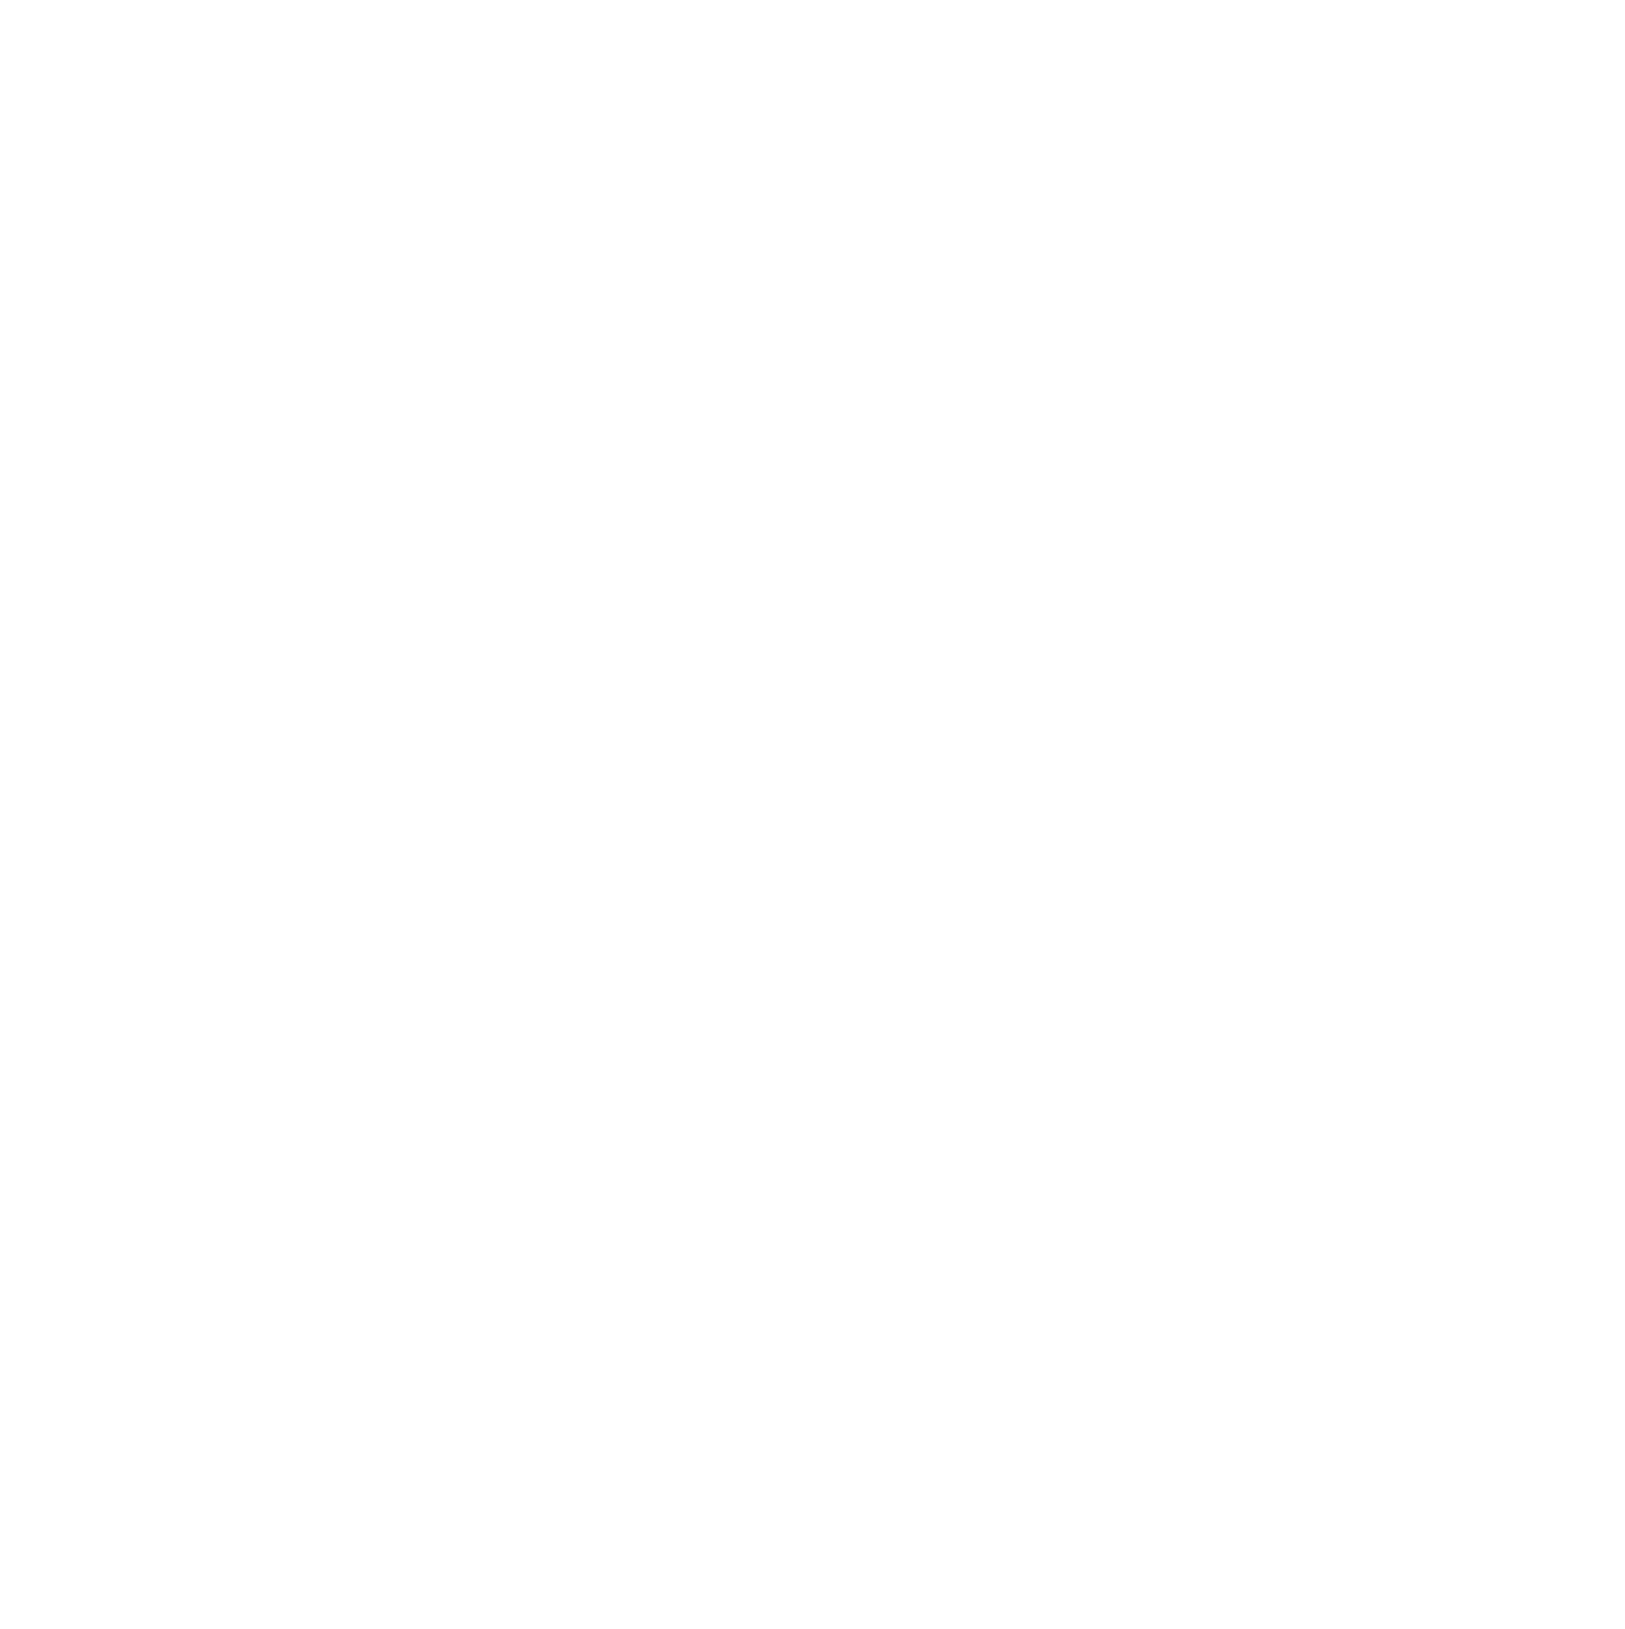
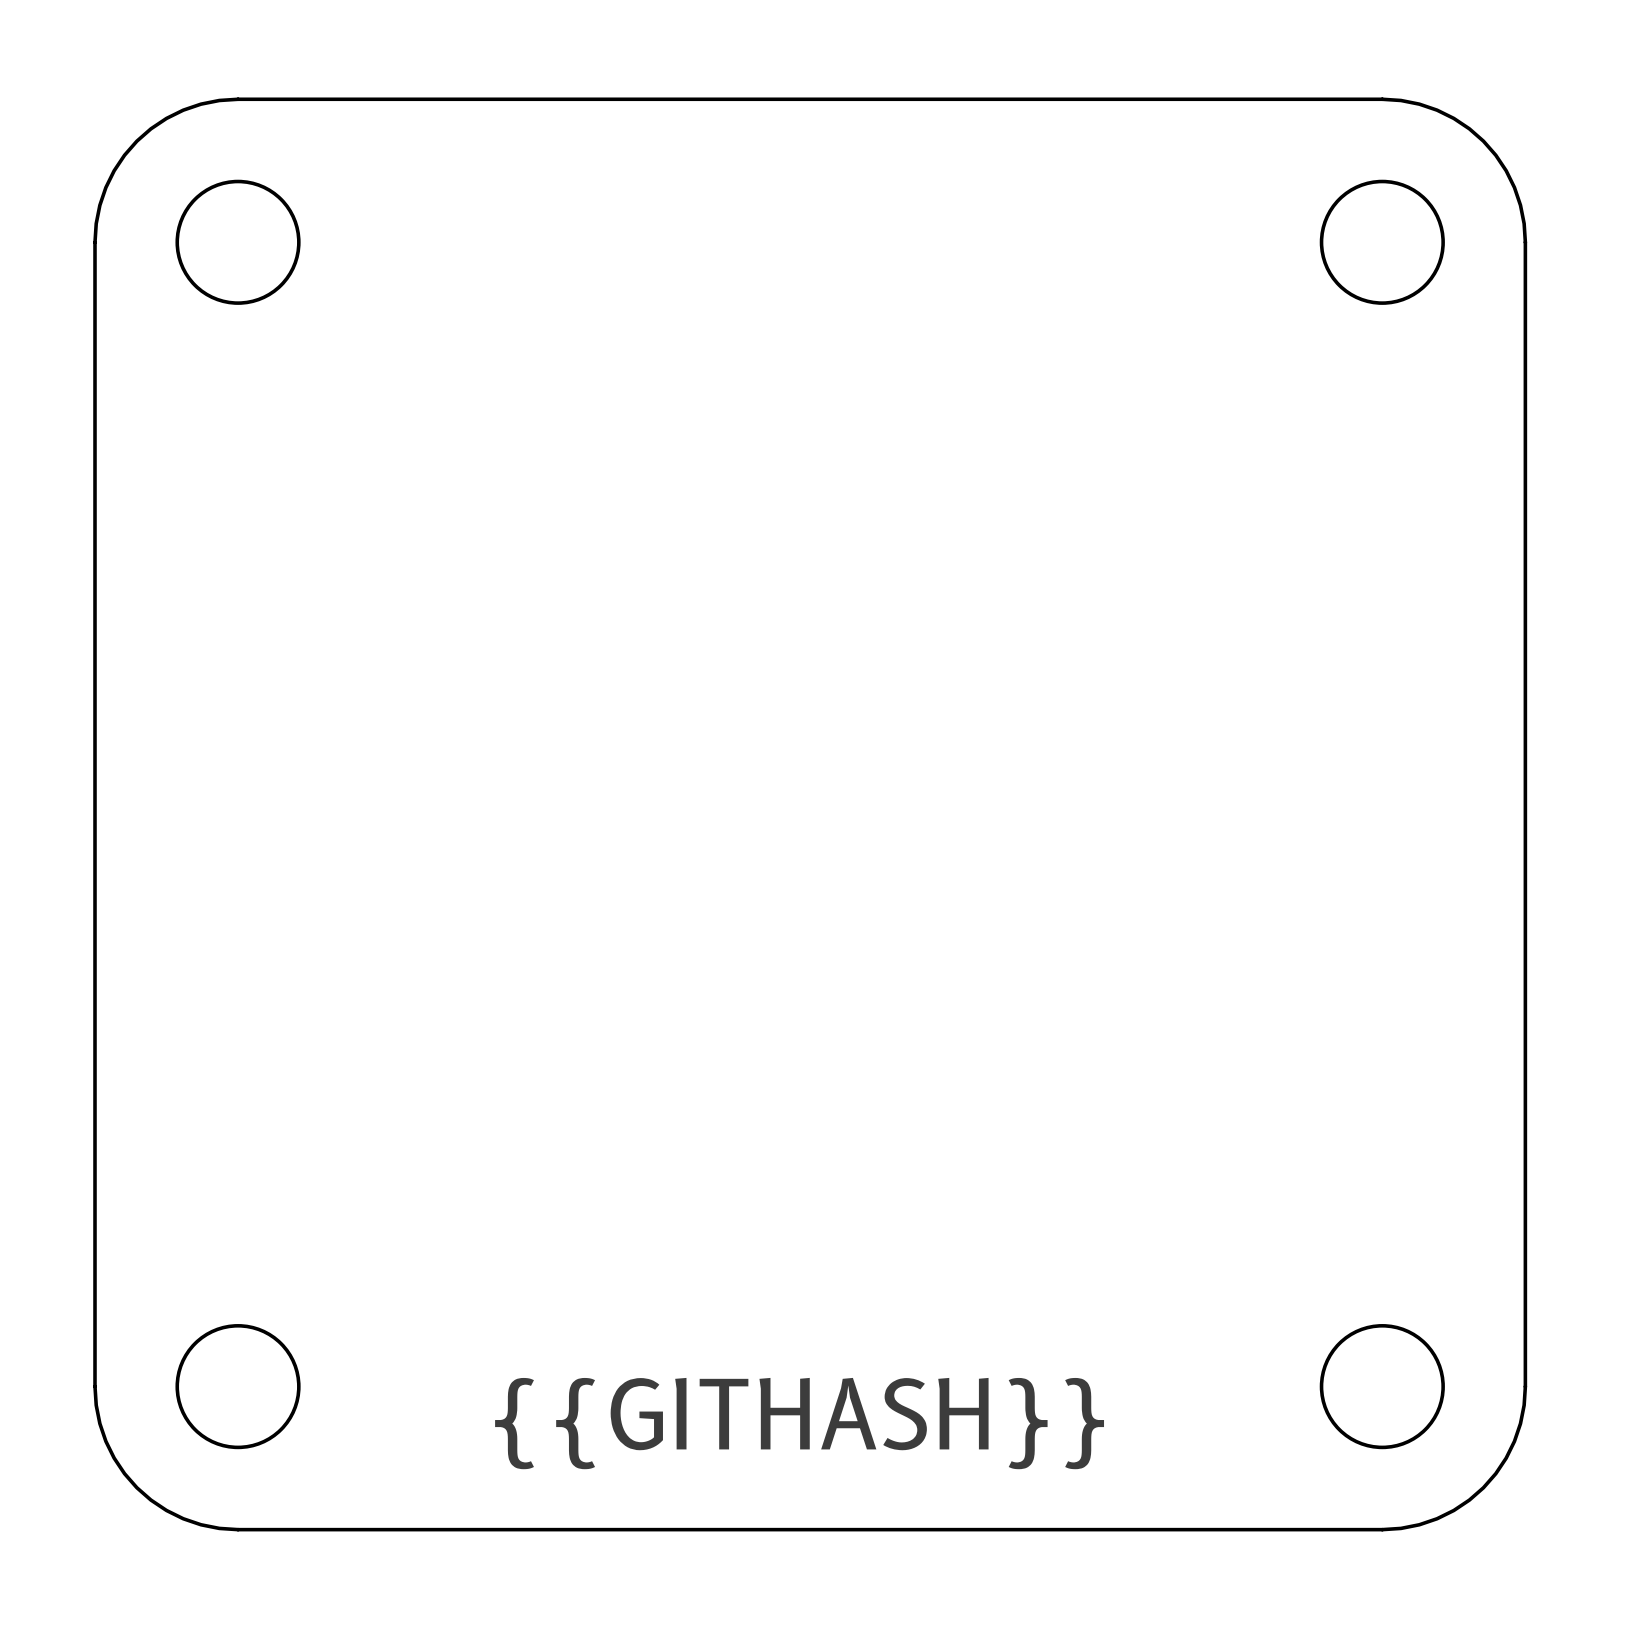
board edge: none -> (238, 99) (1382, 99) (1419, 104) (1437, 110) (1469, 128) (1483, 141) (1495, 155) (1514, 187) (1520, 205) (1525, 242) (1525, 1386) (1524, 1405) (1514, 1441) (1495, 1473) (1483, 1487) (1469, 1500) (1437, 1518) (1419, 1524) (1382, 1529) (238, 1529) (219, 1528) (183, 1518) (150, 1500) (136, 1487) (114, 1458) (105, 1441) (96, 1405) (95, 1386) (96, 223) (105, 187) (114, 170) (136, 141) (150, 128) (183, 110) (201, 104) (238, 99)
round board edge: none -> [175, 179, 301, 305]
round board edge: none -> [1319, 179, 1445, 305]
round board edge: none -> [175, 1324, 301, 1450]
round board edge: none -> [1319, 1324, 1445, 1450]
text: none -> {{GITHASH}} (799, 1423)

